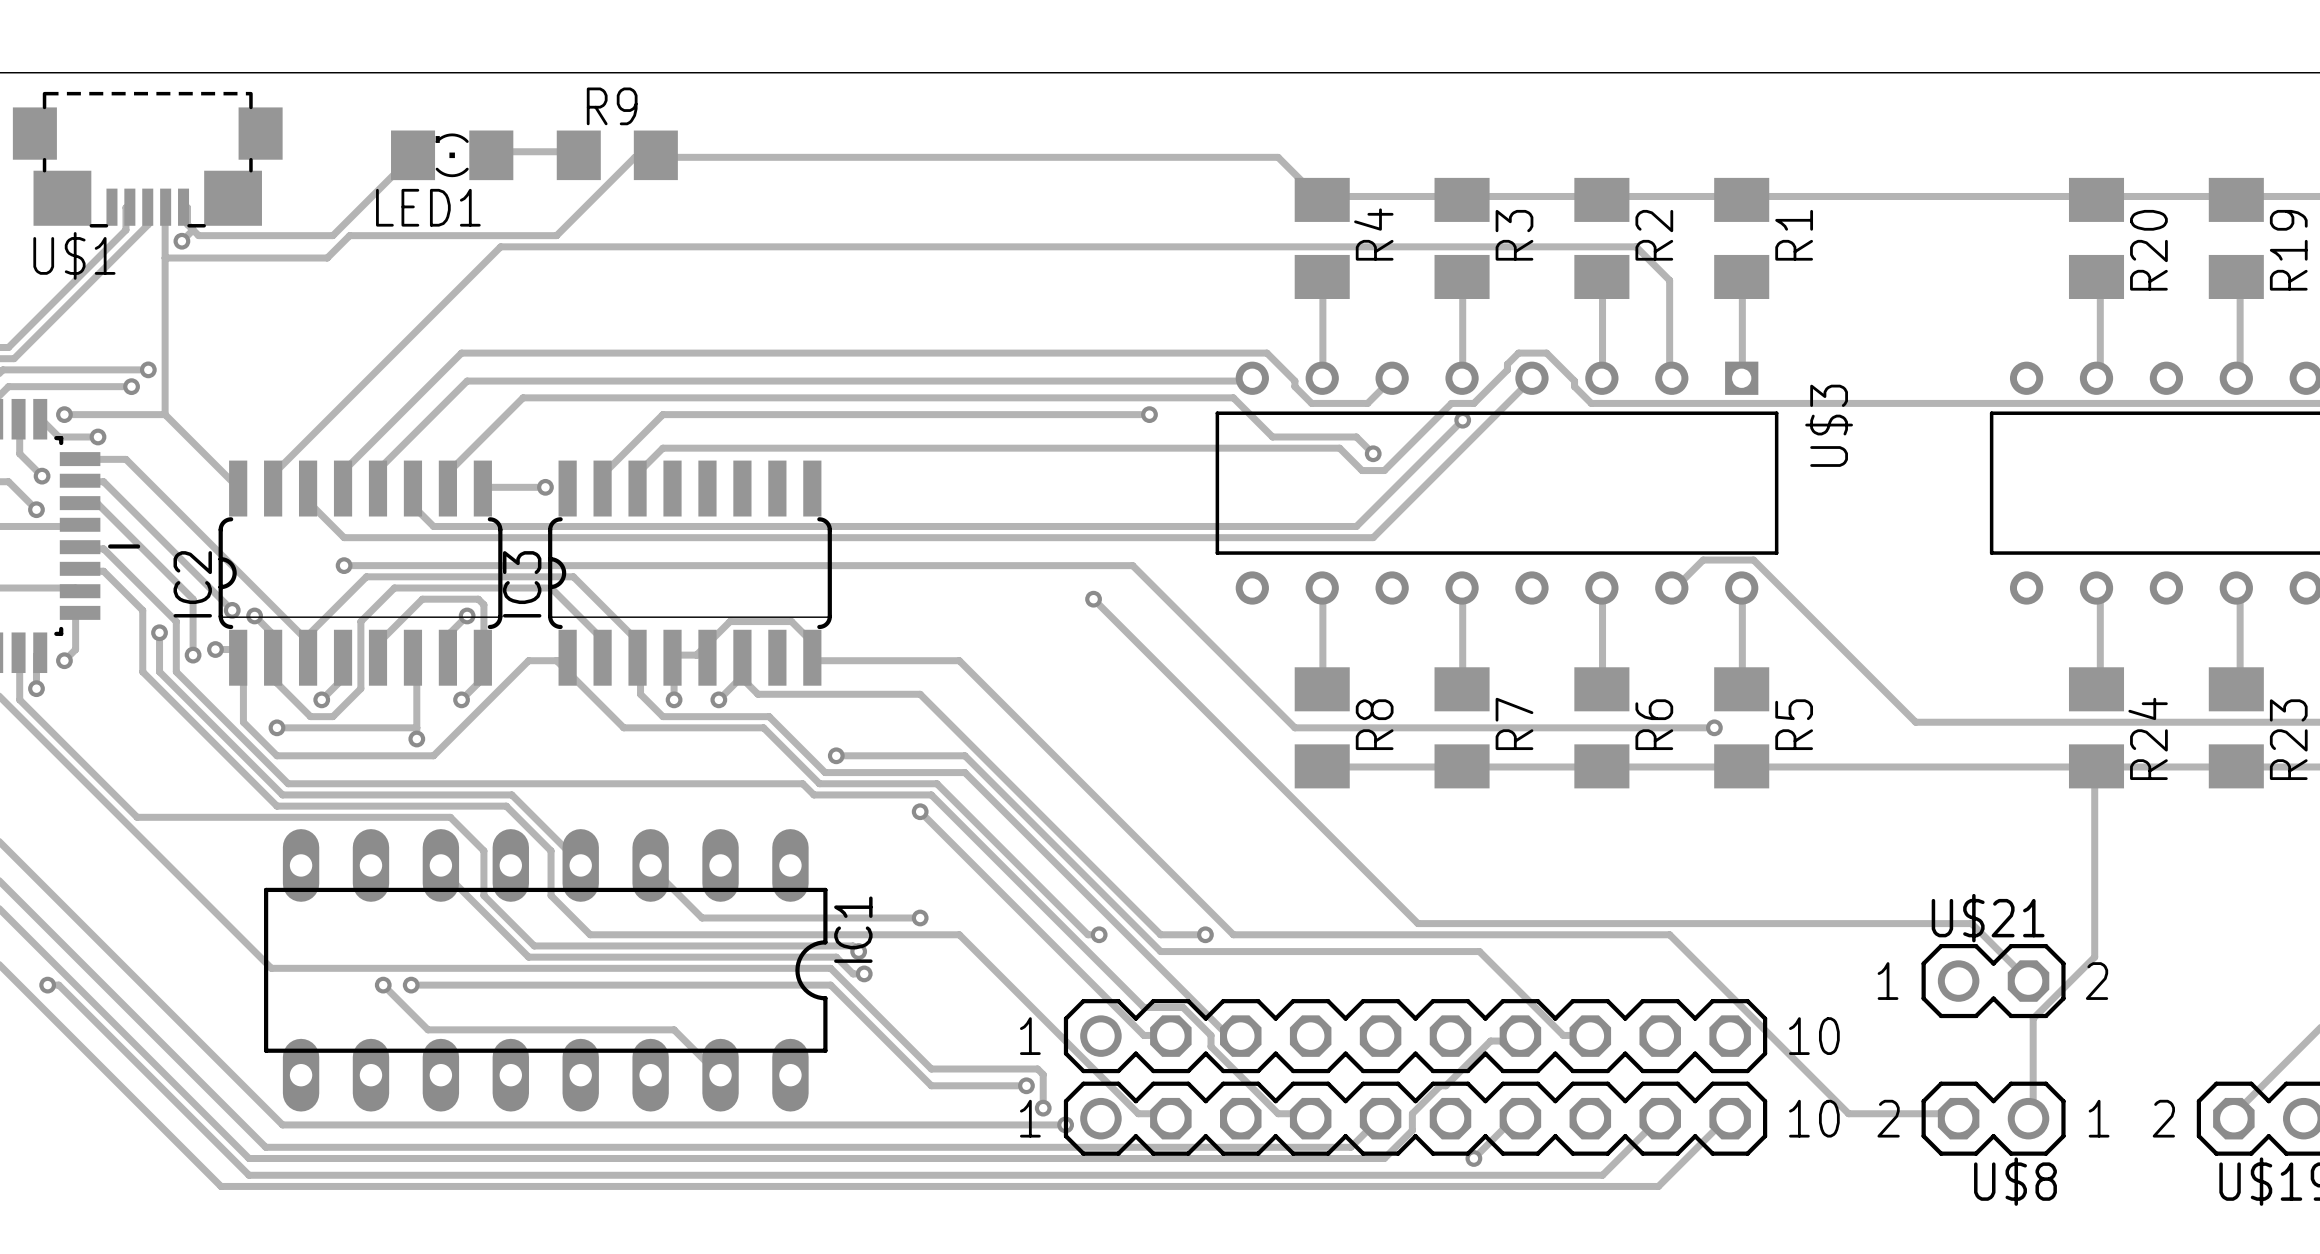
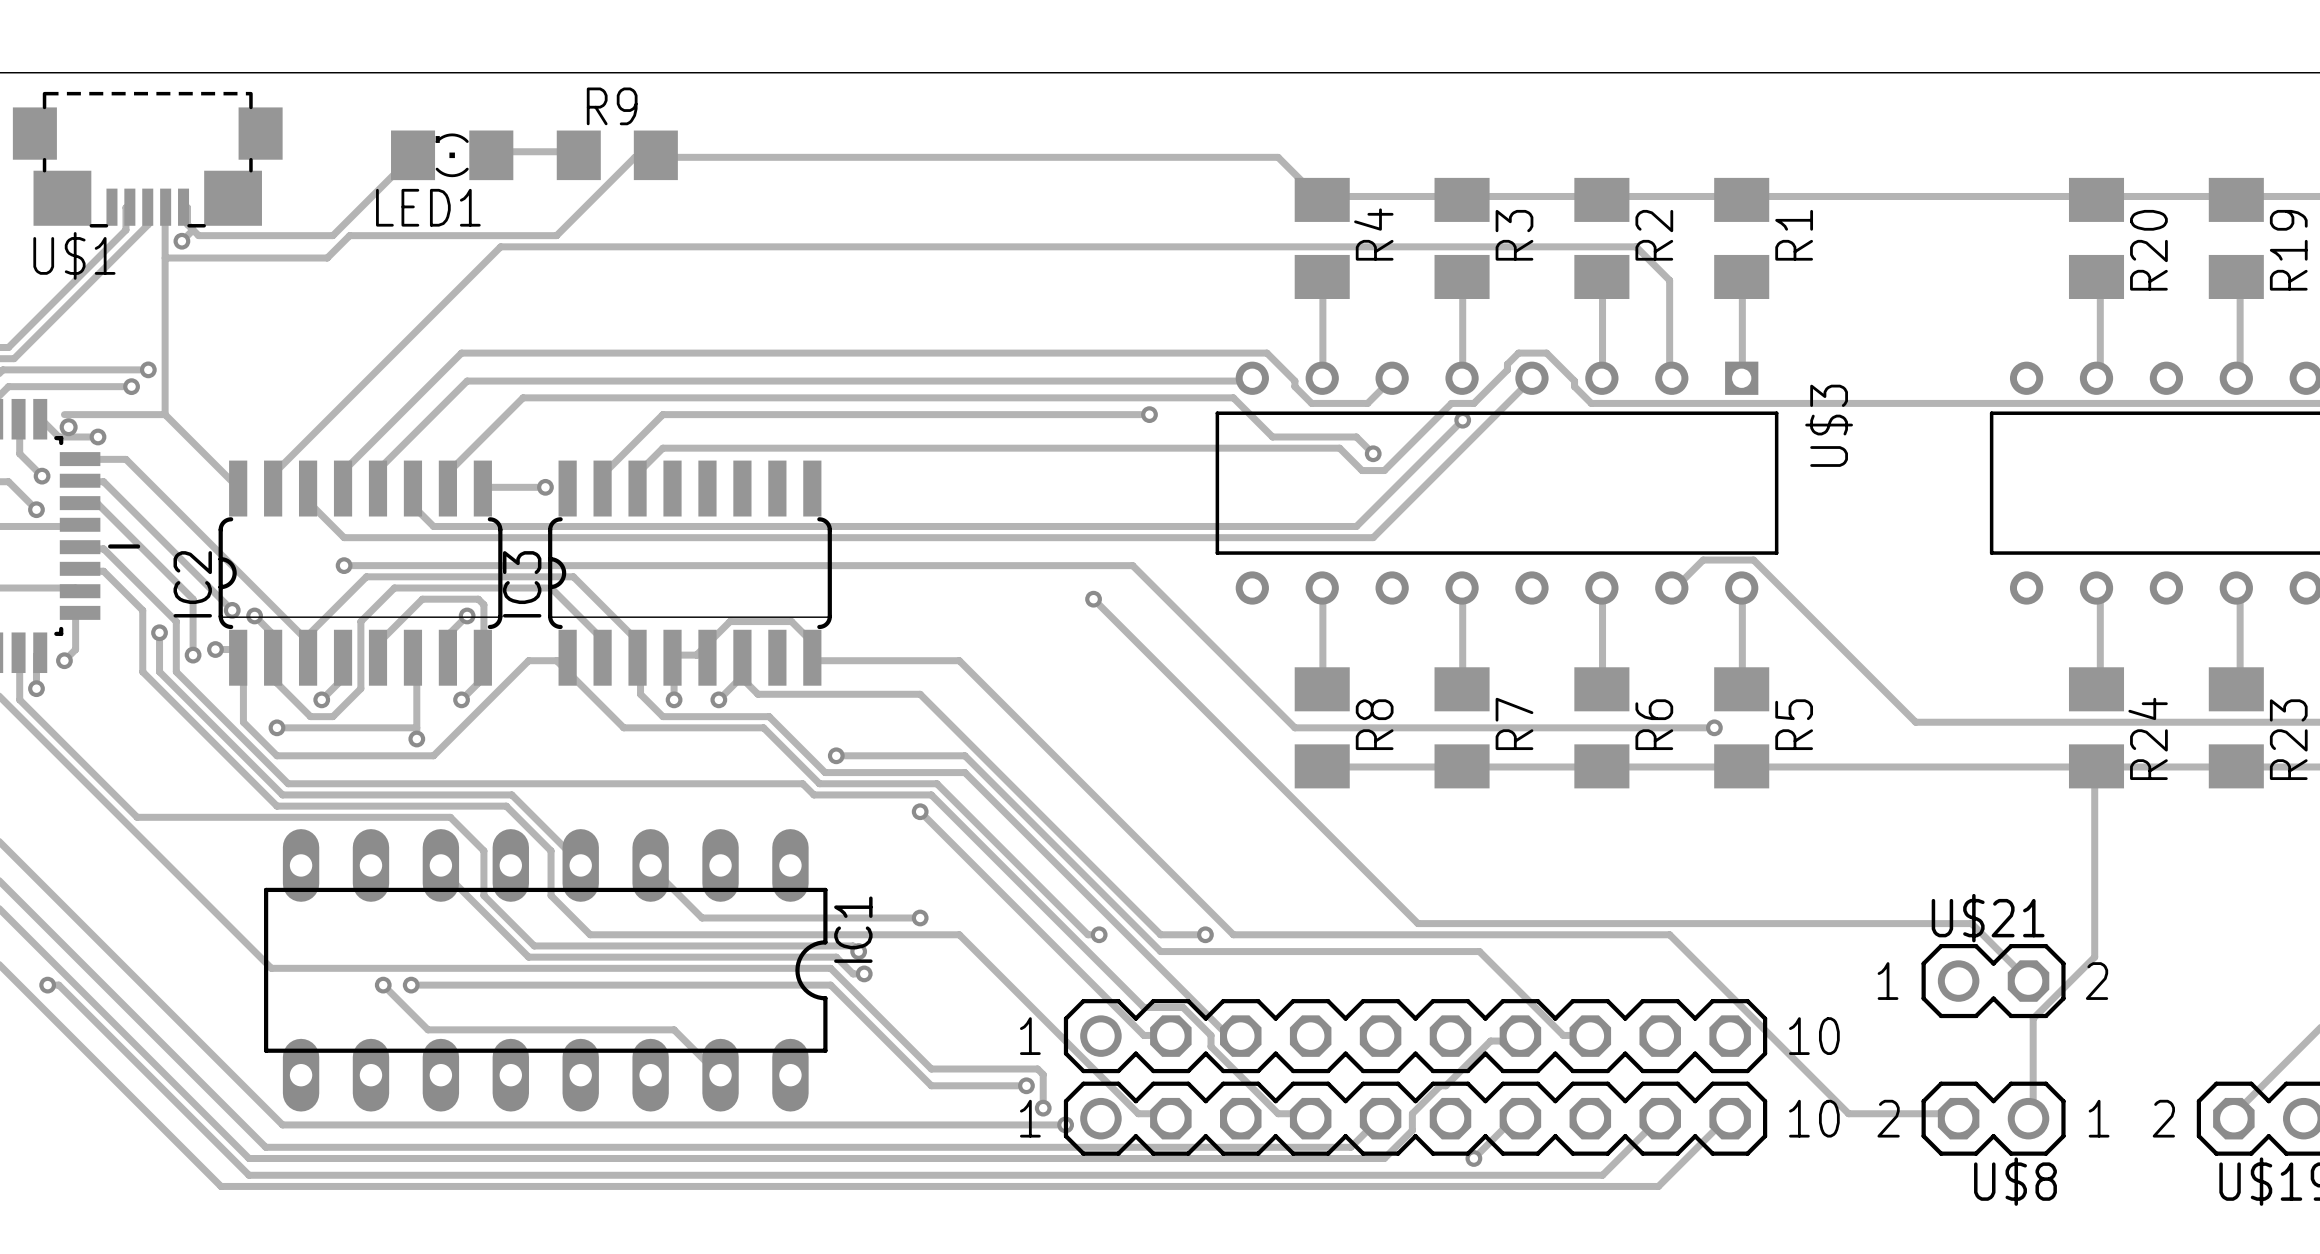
via position: (64, 414) -> (68, 427)

